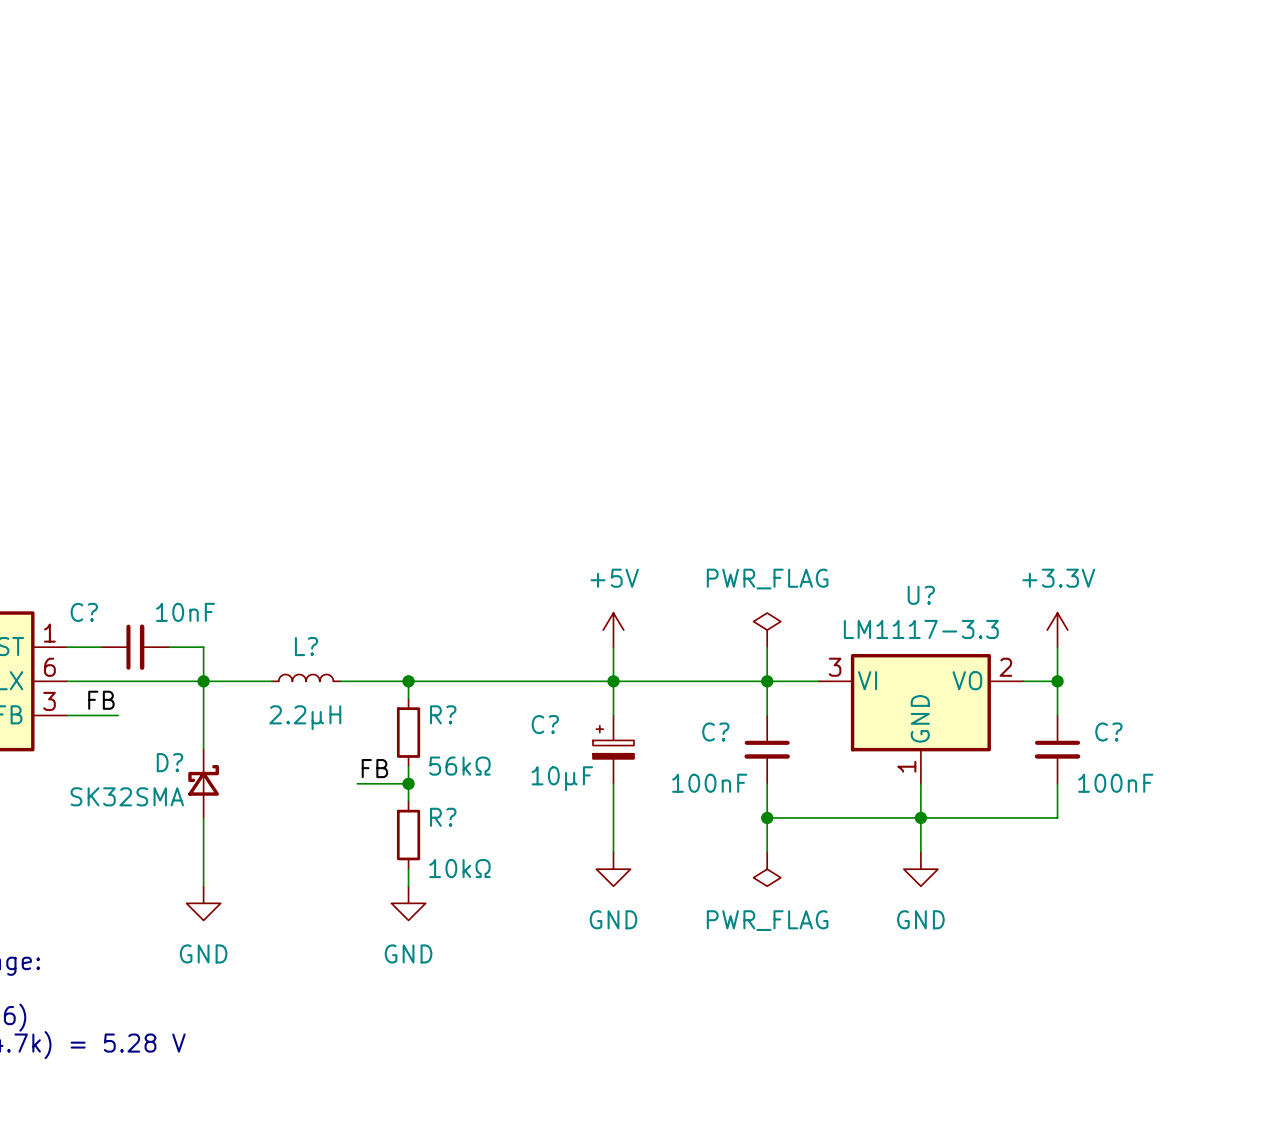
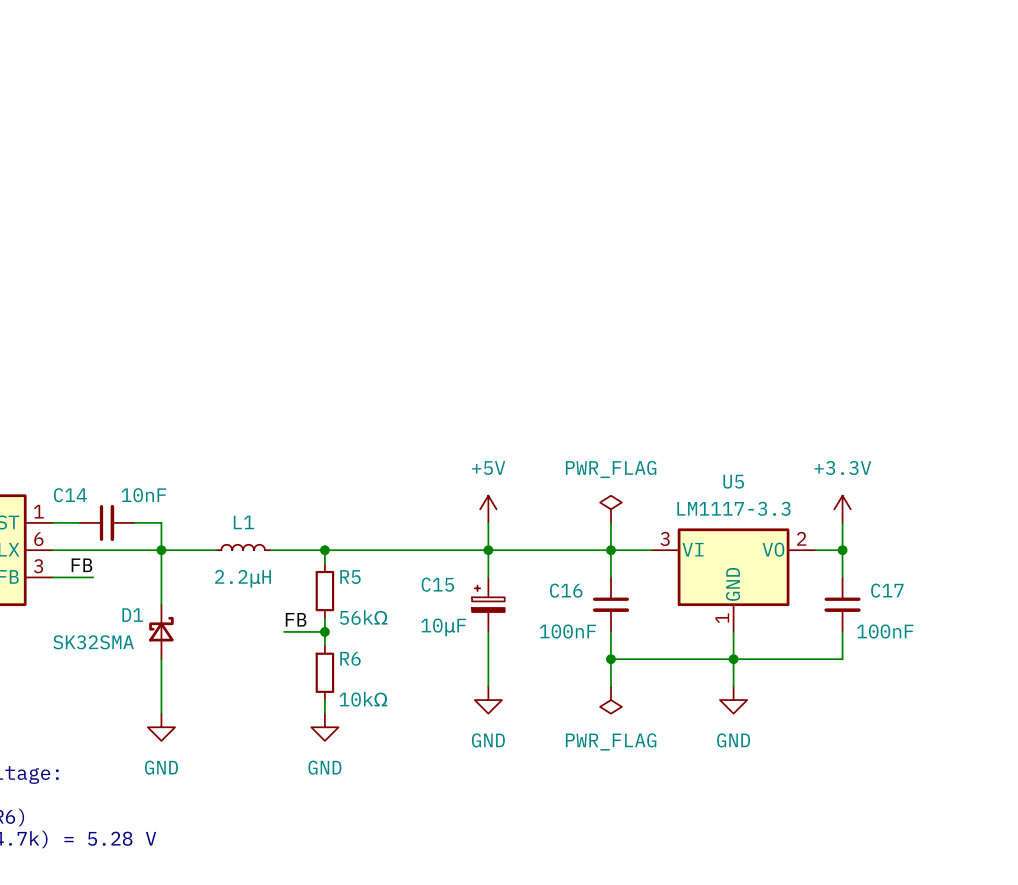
U? name: U? (921, 595) -> U5 (733, 481)
C? name: C? (84, 612) -> C14 (70, 495)
L? name: L? (306, 646) -> L1 (243, 522)
R? name: R? (443, 714) -> R5 (350, 577)
C? name: C? (545, 724) -> C15 (437, 584)
C? name: C? (715, 732) -> C16 (566, 590)
C? name: C? (1108, 732) -> C17 (887, 590)
D? name: D? (169, 762) -> D1 (132, 615)
R? name: R? (443, 817) -> R6 (350, 658)

